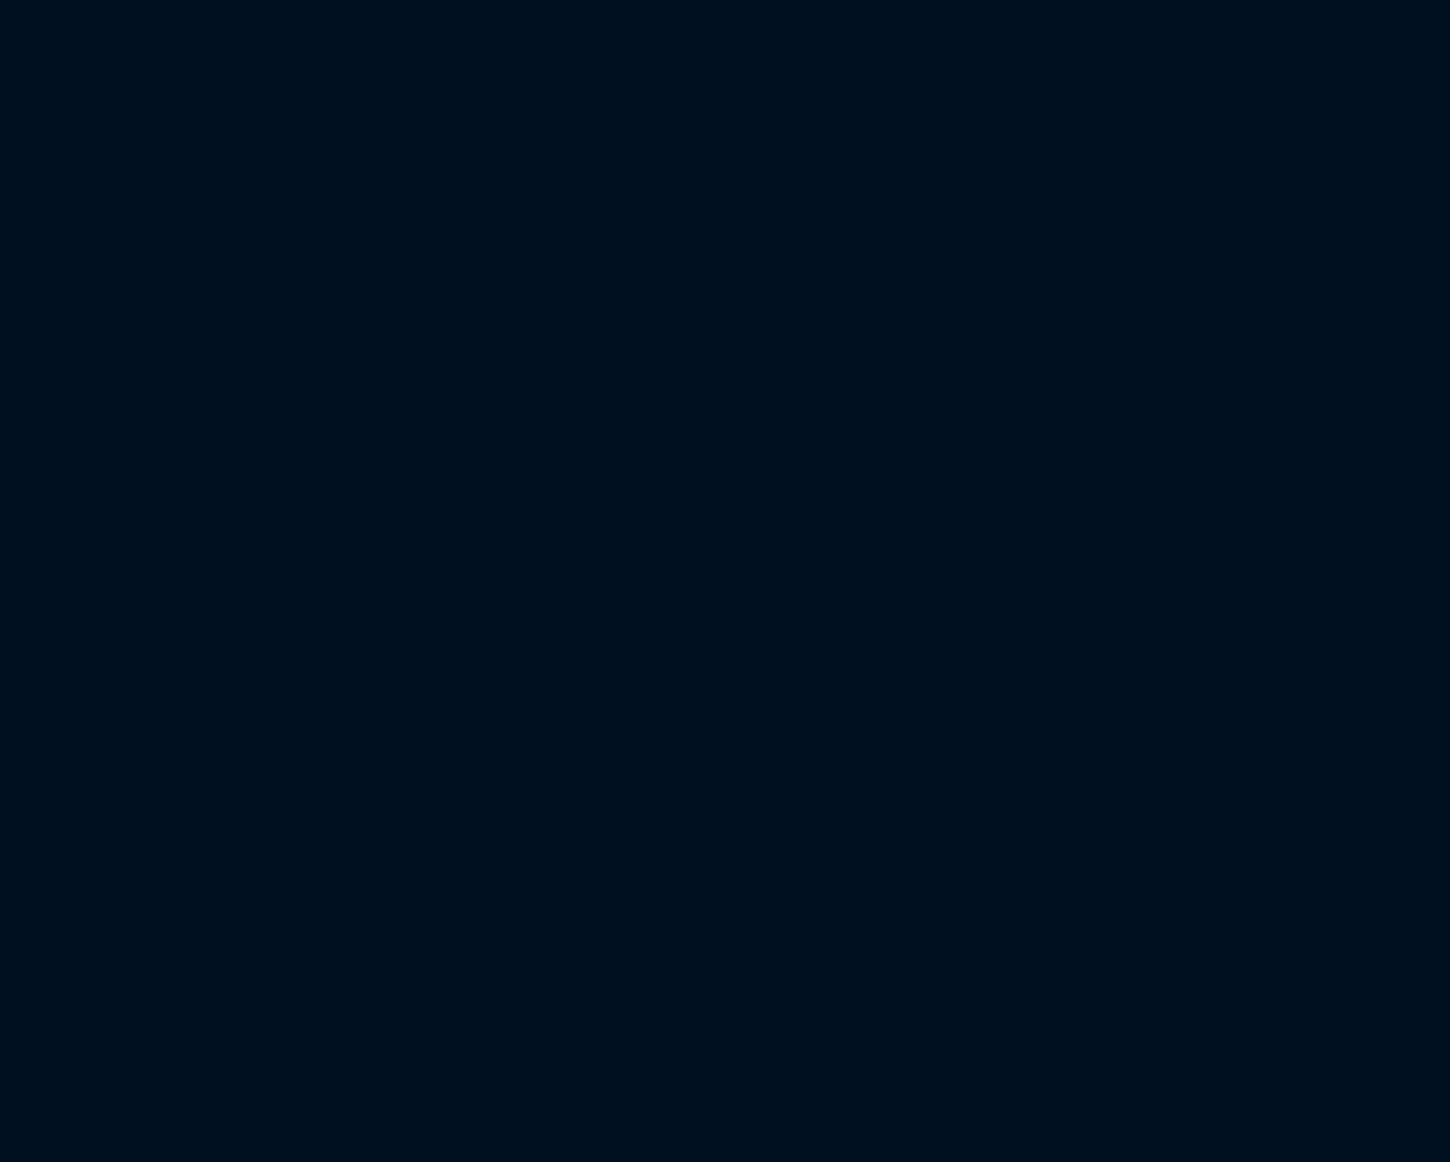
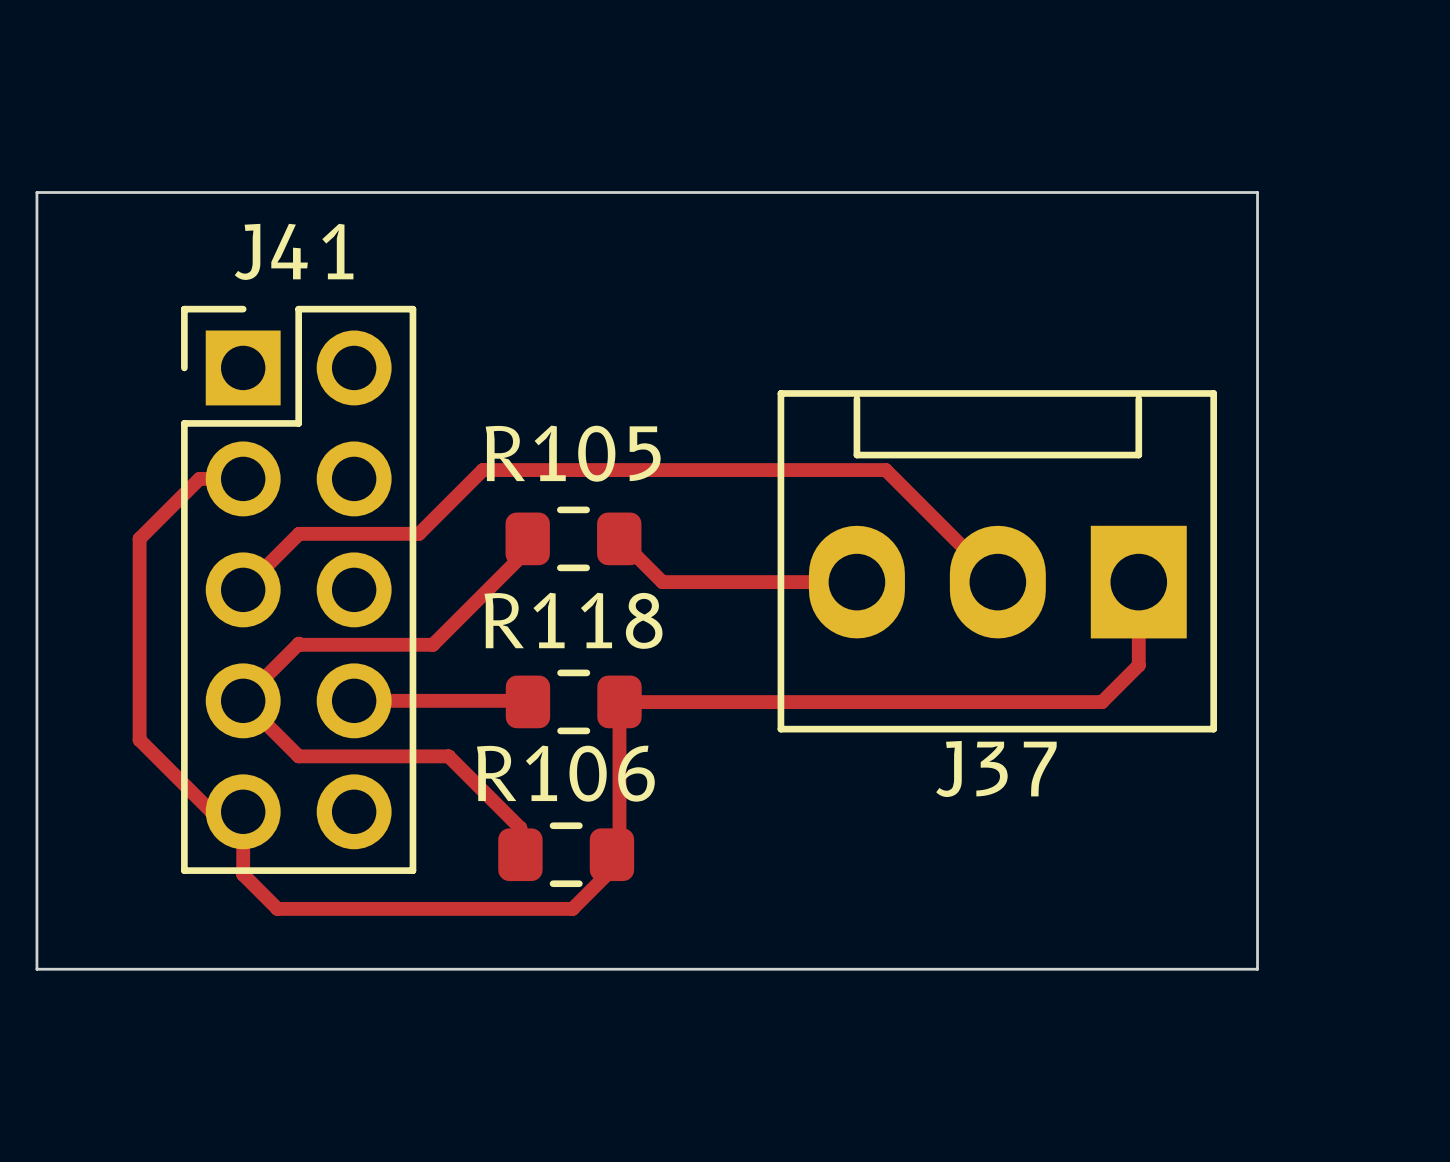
board edge: none -> (36, 192) (1257, 192) (1257, 969) (36, 969) (36, 192)
top track: none -> (243, 478) (199, 478) (139, 538) (139, 739) (211, 811) (243, 811) (243, 874) (277, 908) (572, 908) (611, 869) (611, 854) (619, 847) (619, 701)
top track: none -> (527, 538) (527, 550) (432, 644) (298, 643) (243, 699) (298, 756) (448, 756) (520, 828) (520, 854)
R105: none -> (573, 538)
top track: none -> (619, 538) (662, 582) (856, 582)
J37: none -> (997, 561)
top track: none -> (997, 582) (885, 470) (482, 470) (419, 533) (299, 533) (243, 589)
top track: none -> (1138, 582) (1138, 665) (1102, 702) (619, 702)
J41: none -> (298, 589)
top track: none -> (354, 700) (527, 701)
R118: none -> (573, 701)
R106: none -> (566, 854)

